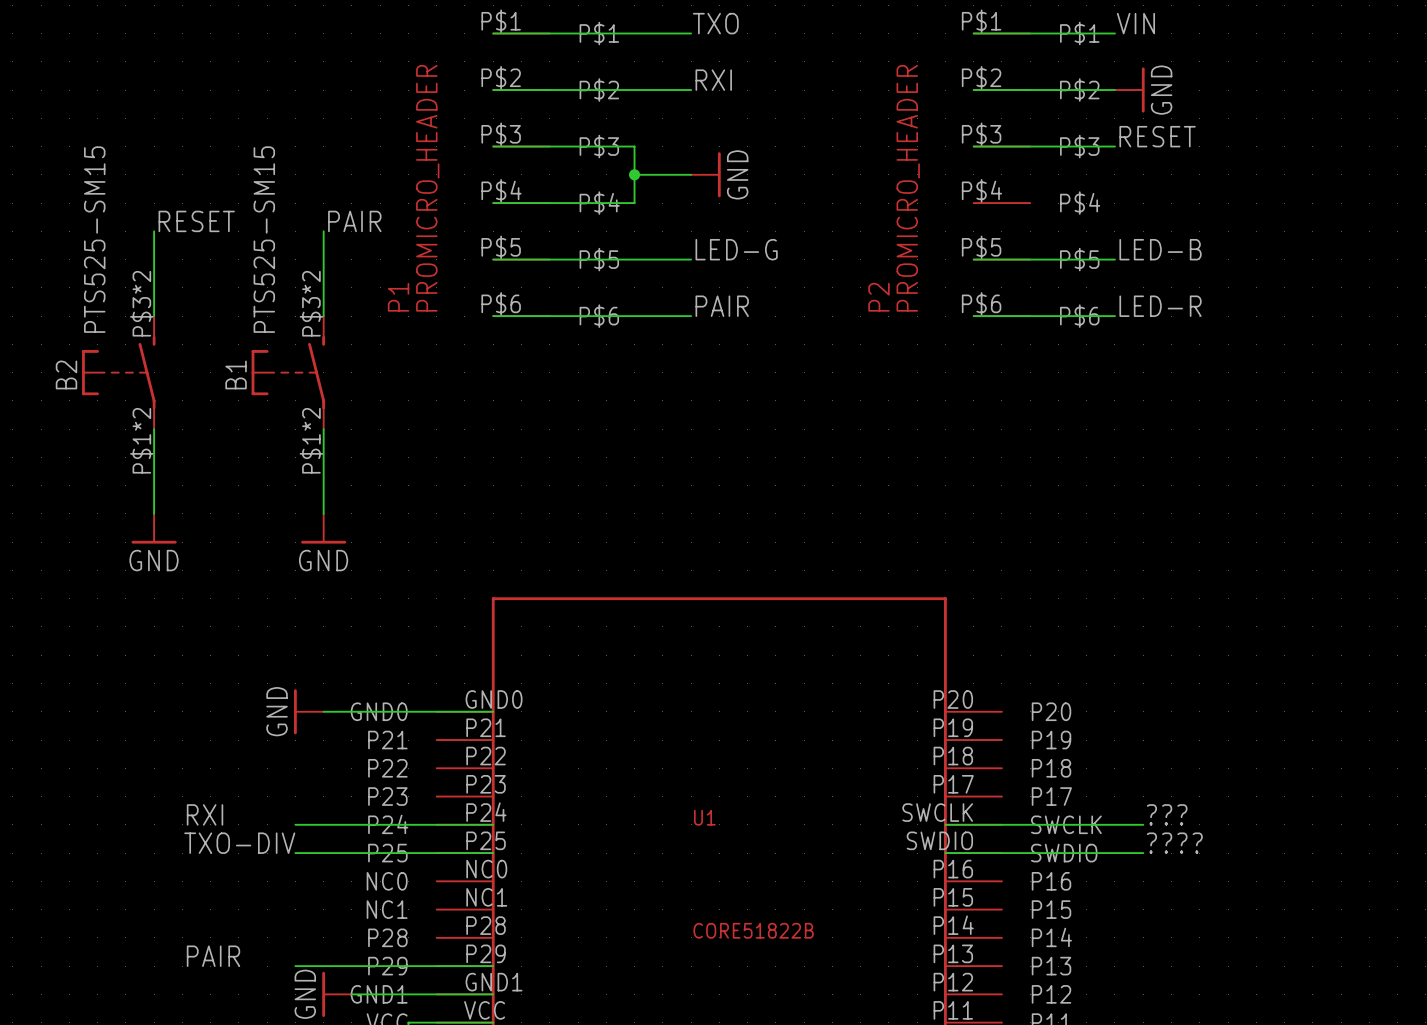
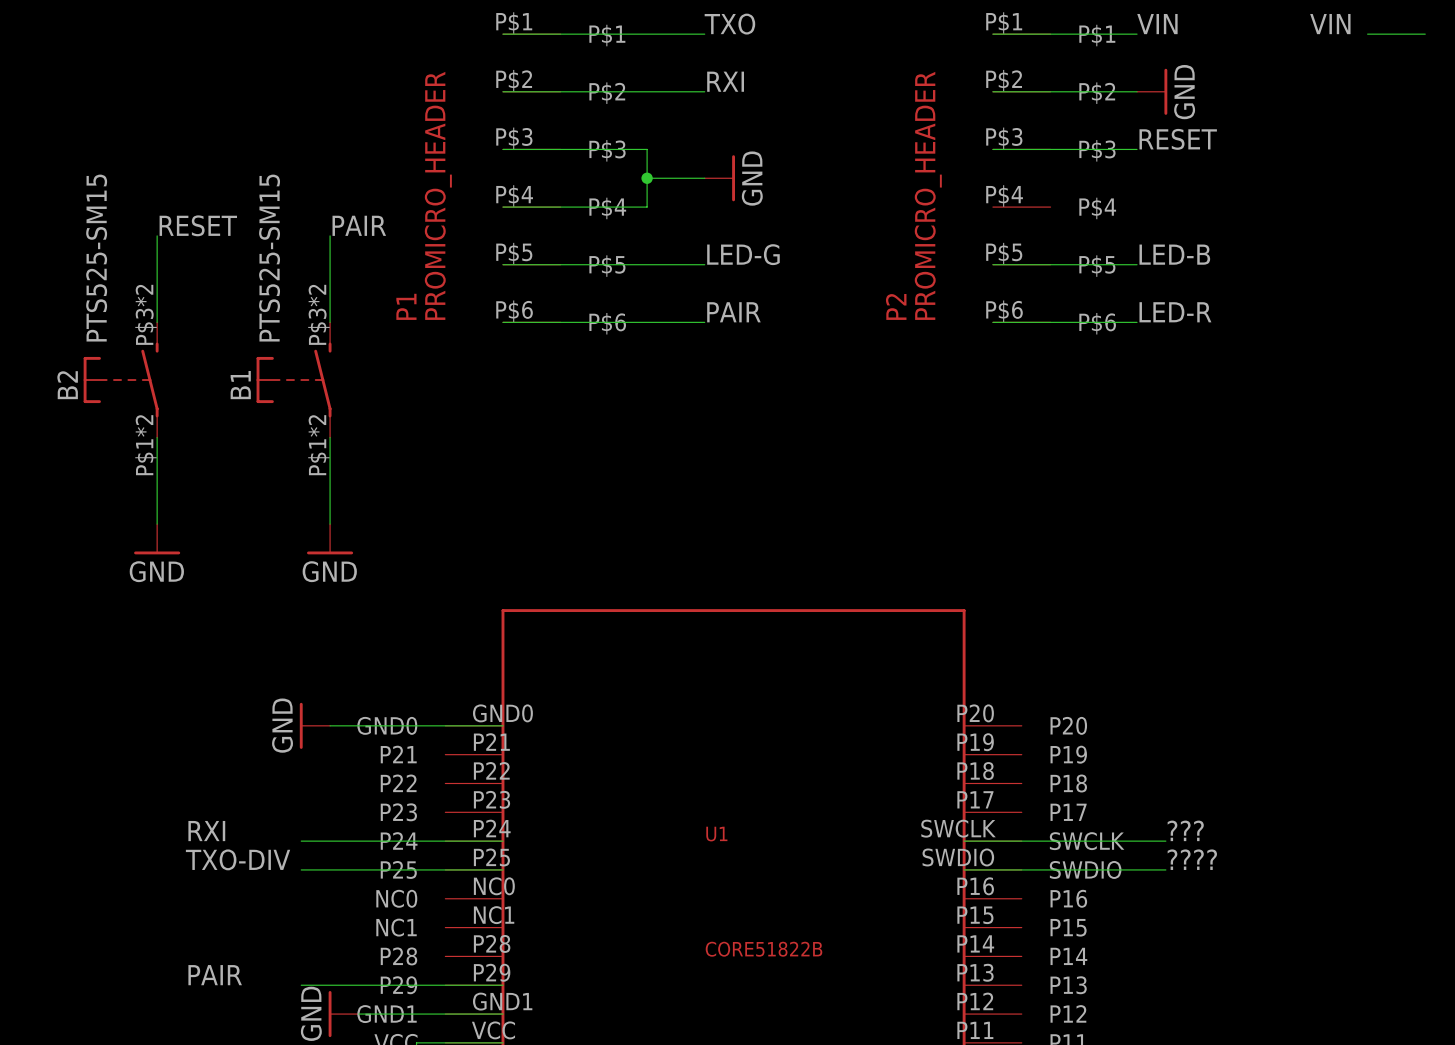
label: none -> VIN (1330, 24)
wire: none -> (1367, 34) (1425, 34)

